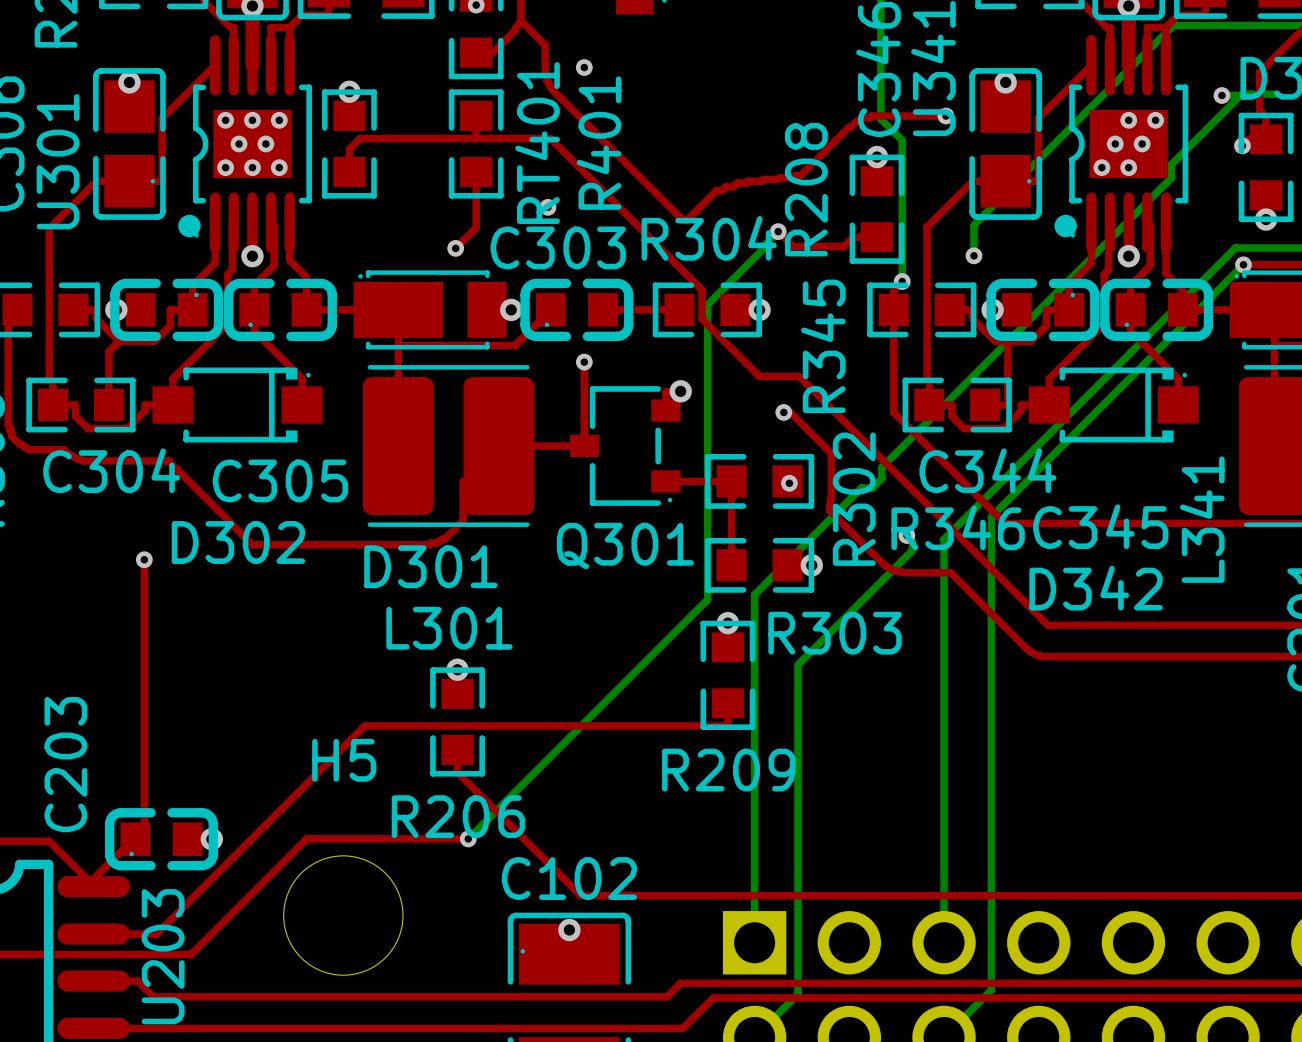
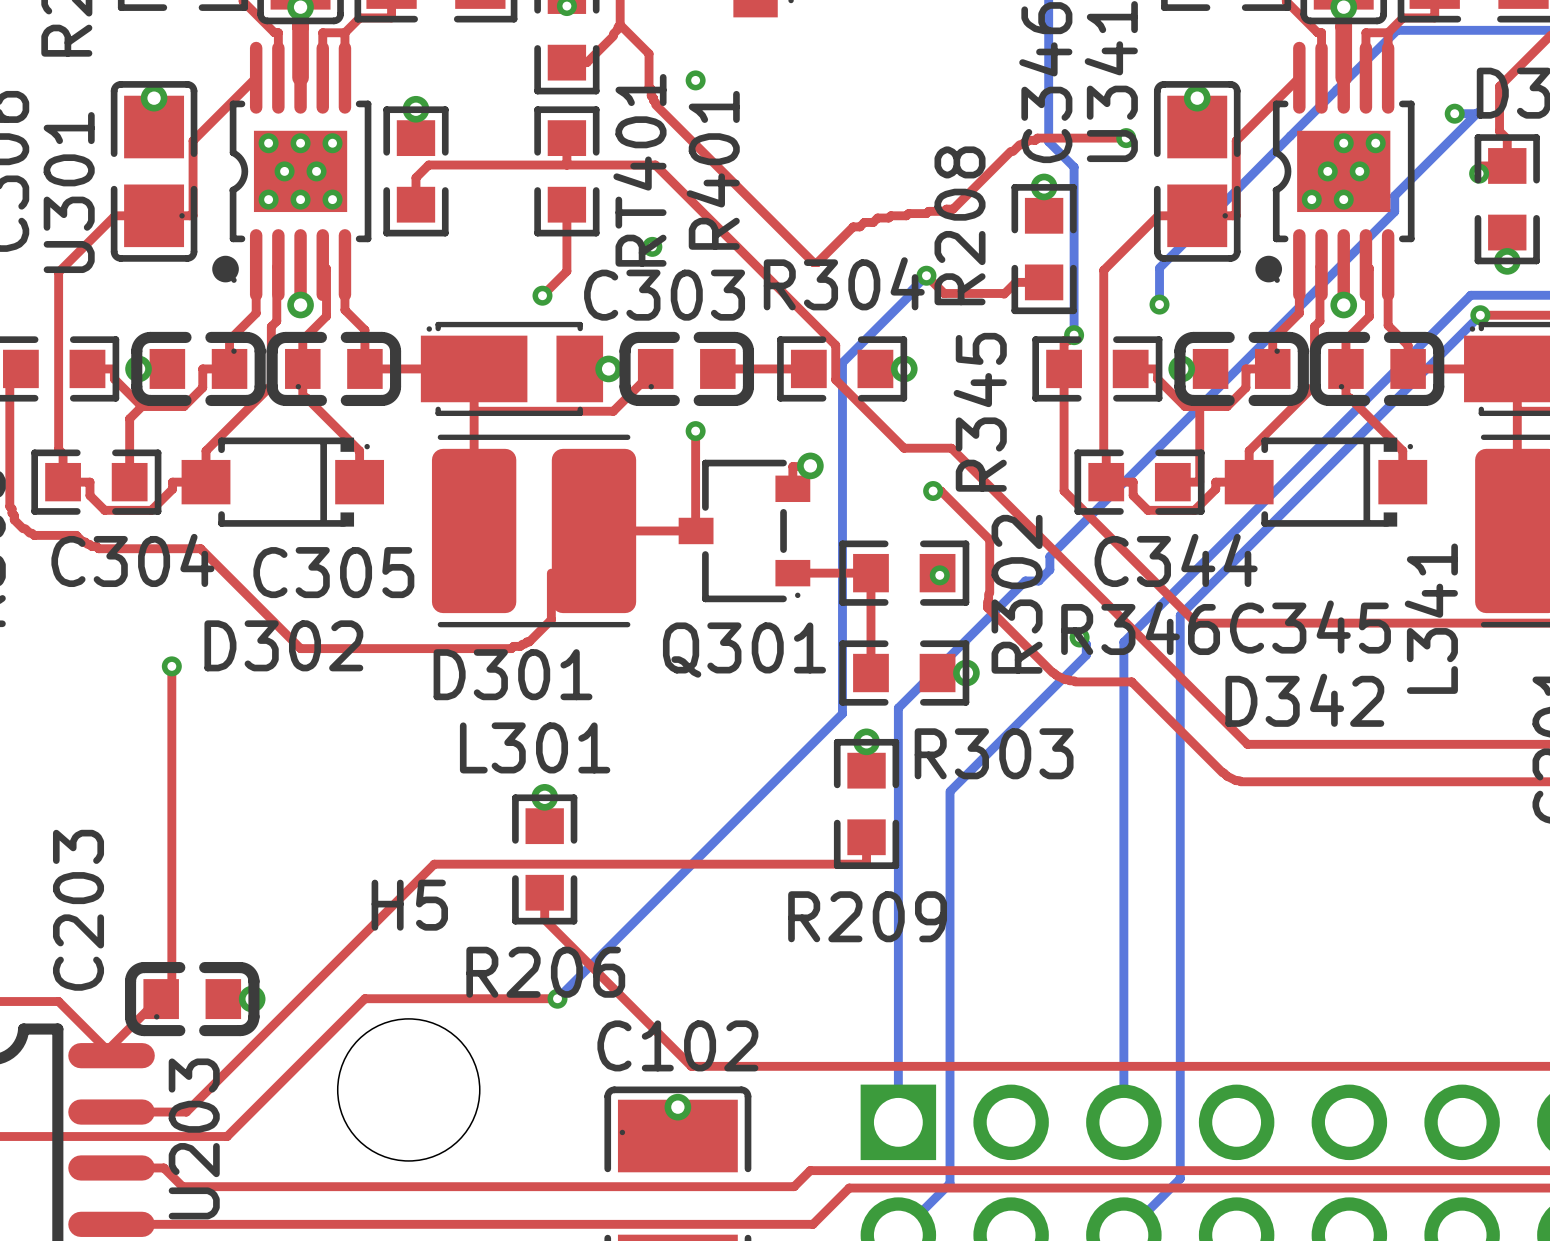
bottom track: (1241, 94) (1275, 94) -> none

